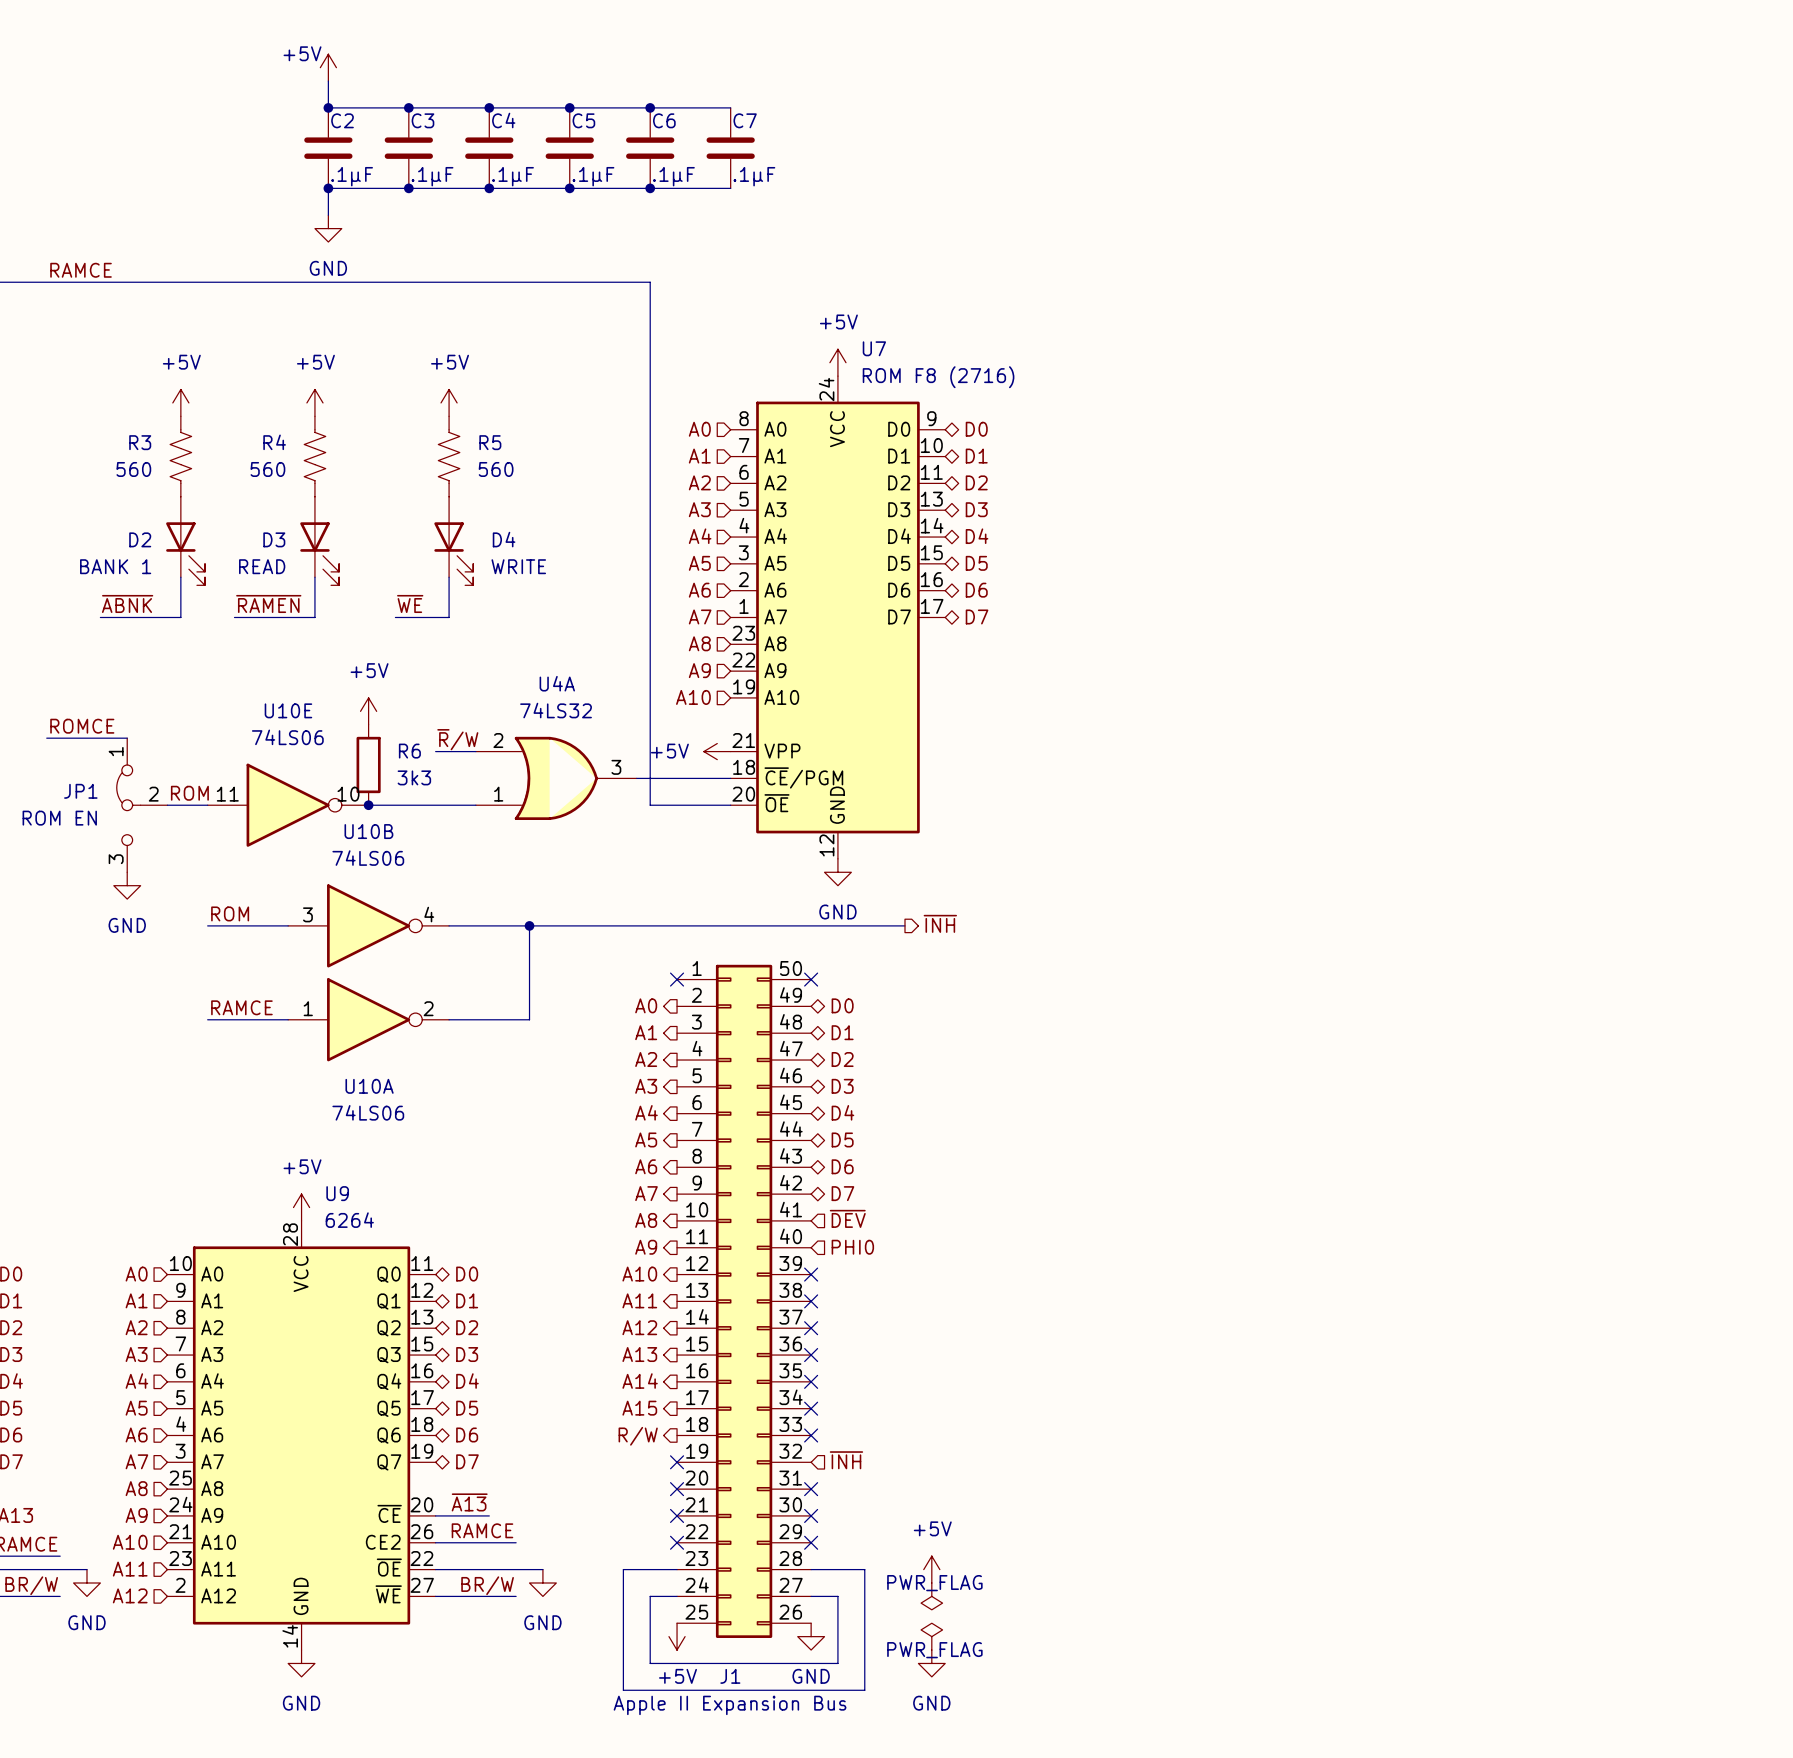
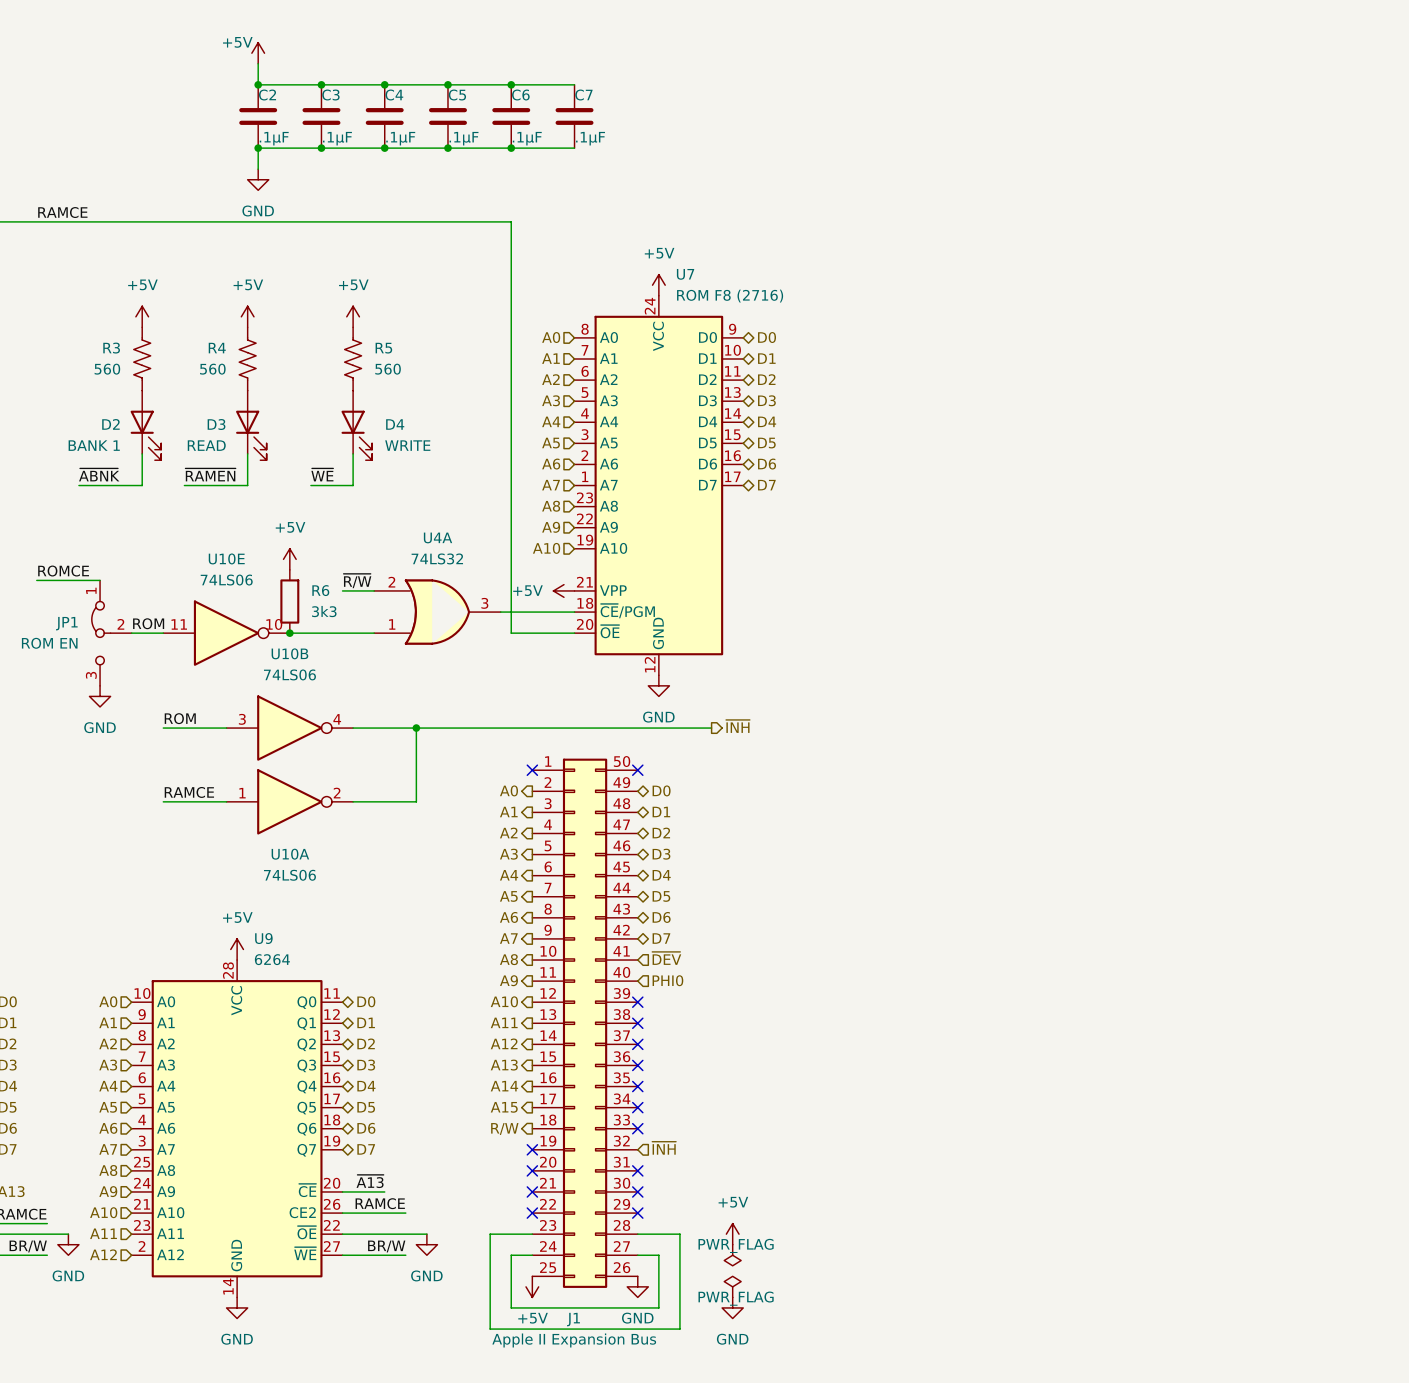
label: ~{R}/W (457, 739) -> ~{R/W} (357, 581)

